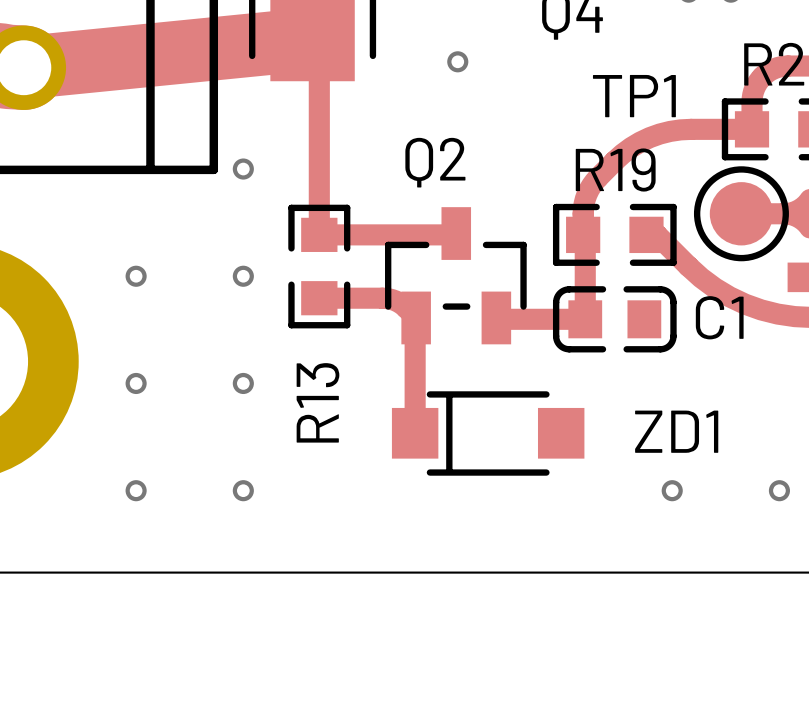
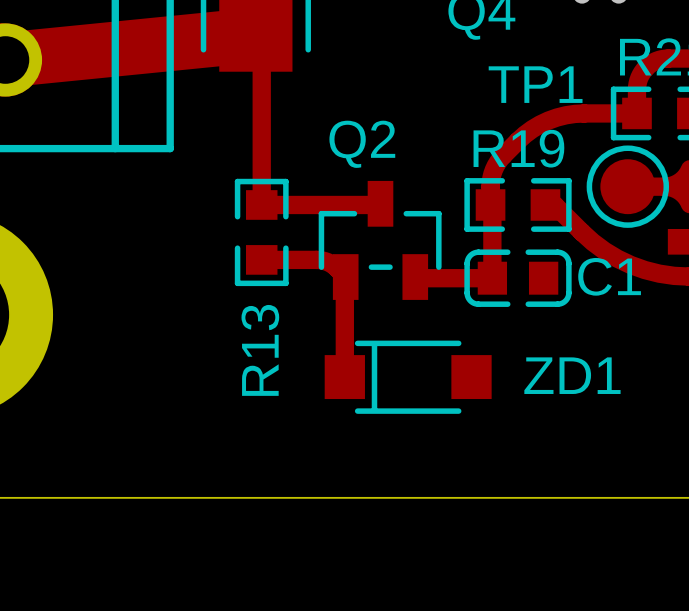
via: (457, 61) -> none
via: (243, 169) -> none
via: (136, 276) -> none
via: (243, 276) -> none
via: (136, 383) -> none
via: (243, 383) -> none
via: (136, 490) -> none
via: (243, 490) -> none
via: (672, 490) -> none
via: (779, 490) -> none

